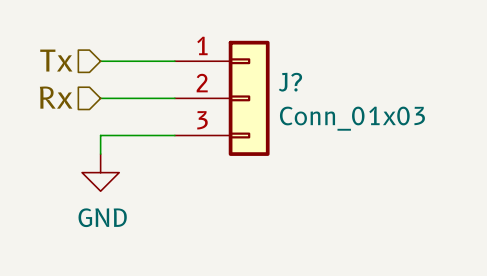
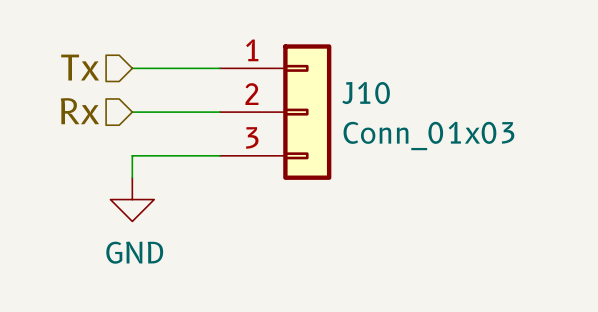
J? name: J? (290, 82) -> J10 (366, 93)

